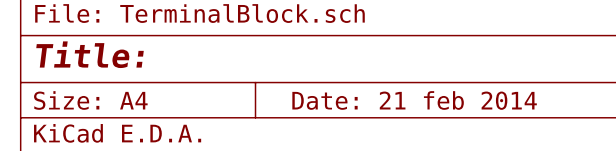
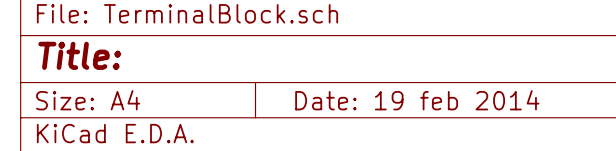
title block: Date: 21 feb 2014 (414, 100) -> Date: 19 feb 2014 (417, 100)

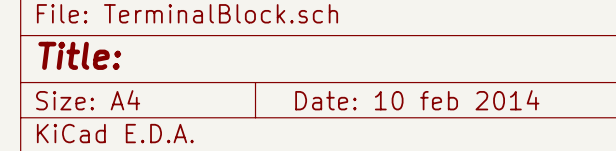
title block: Date: 19 feb 2014 (417, 100) -> Date: 10 feb 2014 (417, 100)

